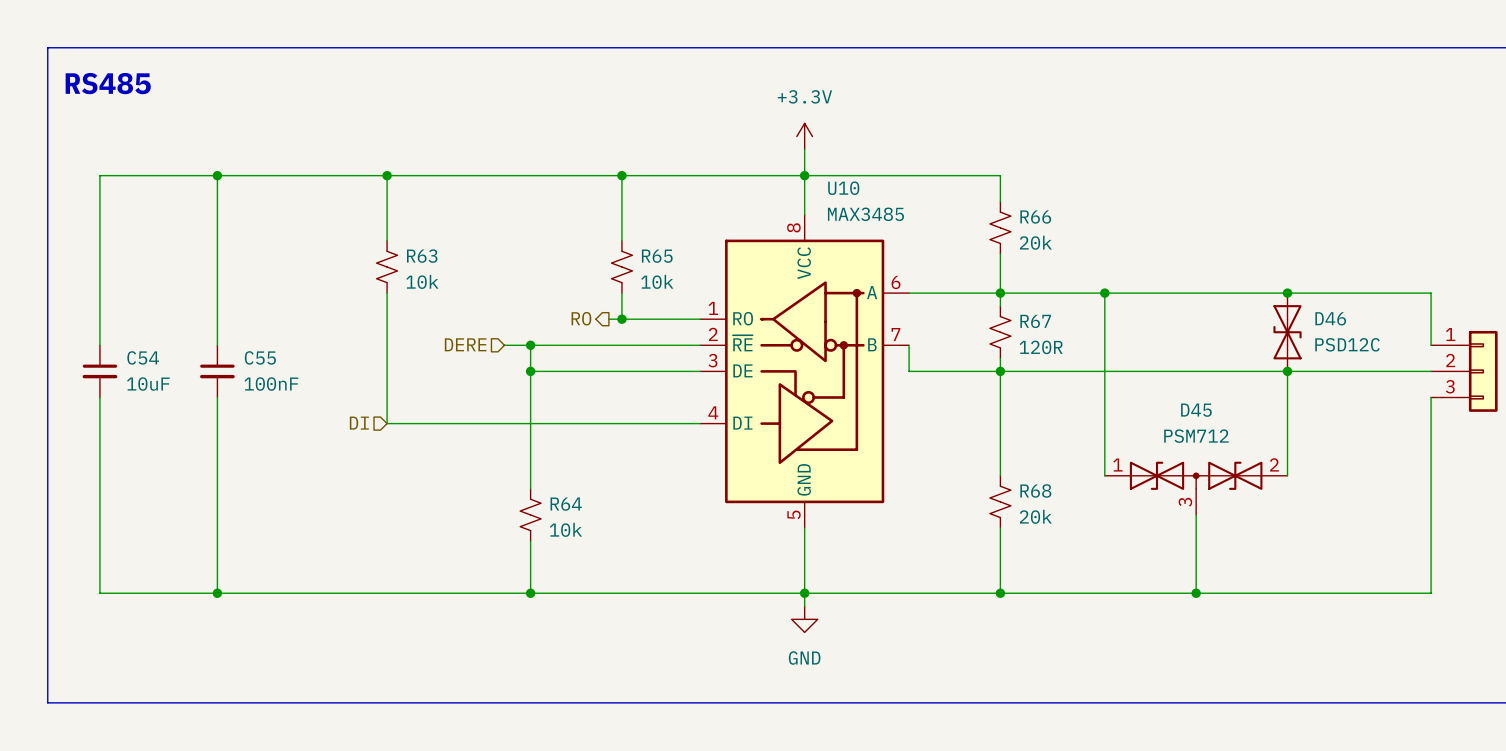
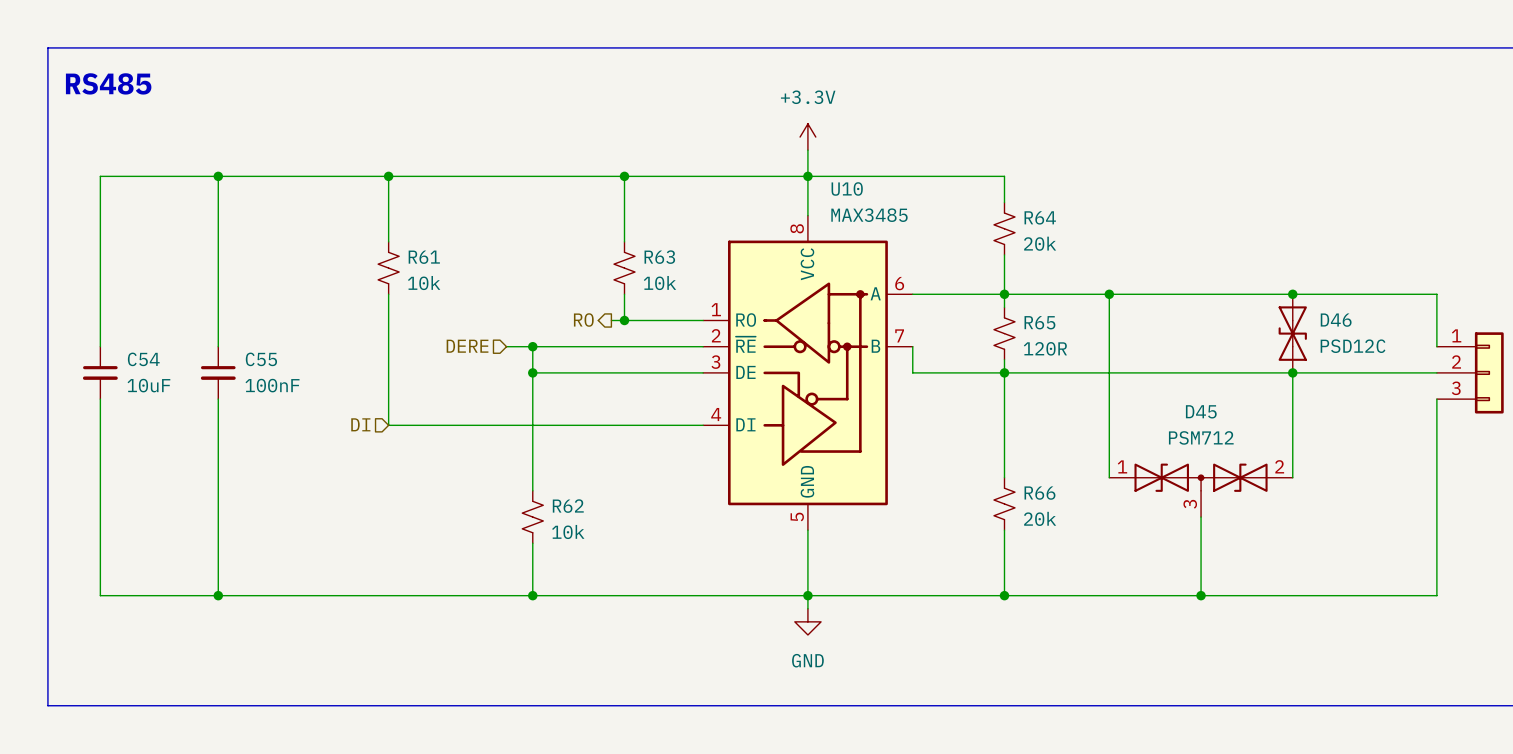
R66 name: R66 (1035, 217) -> R64 (1040, 217)
R63 name: R63 (422, 256) -> R61 (424, 257)
R65 name: R65 (657, 256) -> R63 (659, 257)
R67 name: R67 (1035, 321) -> R65 (1039, 322)
R68 name: R68 (1035, 490) -> R66 (1039, 493)
R64 name: R64 (566, 504) -> R62 (568, 506)

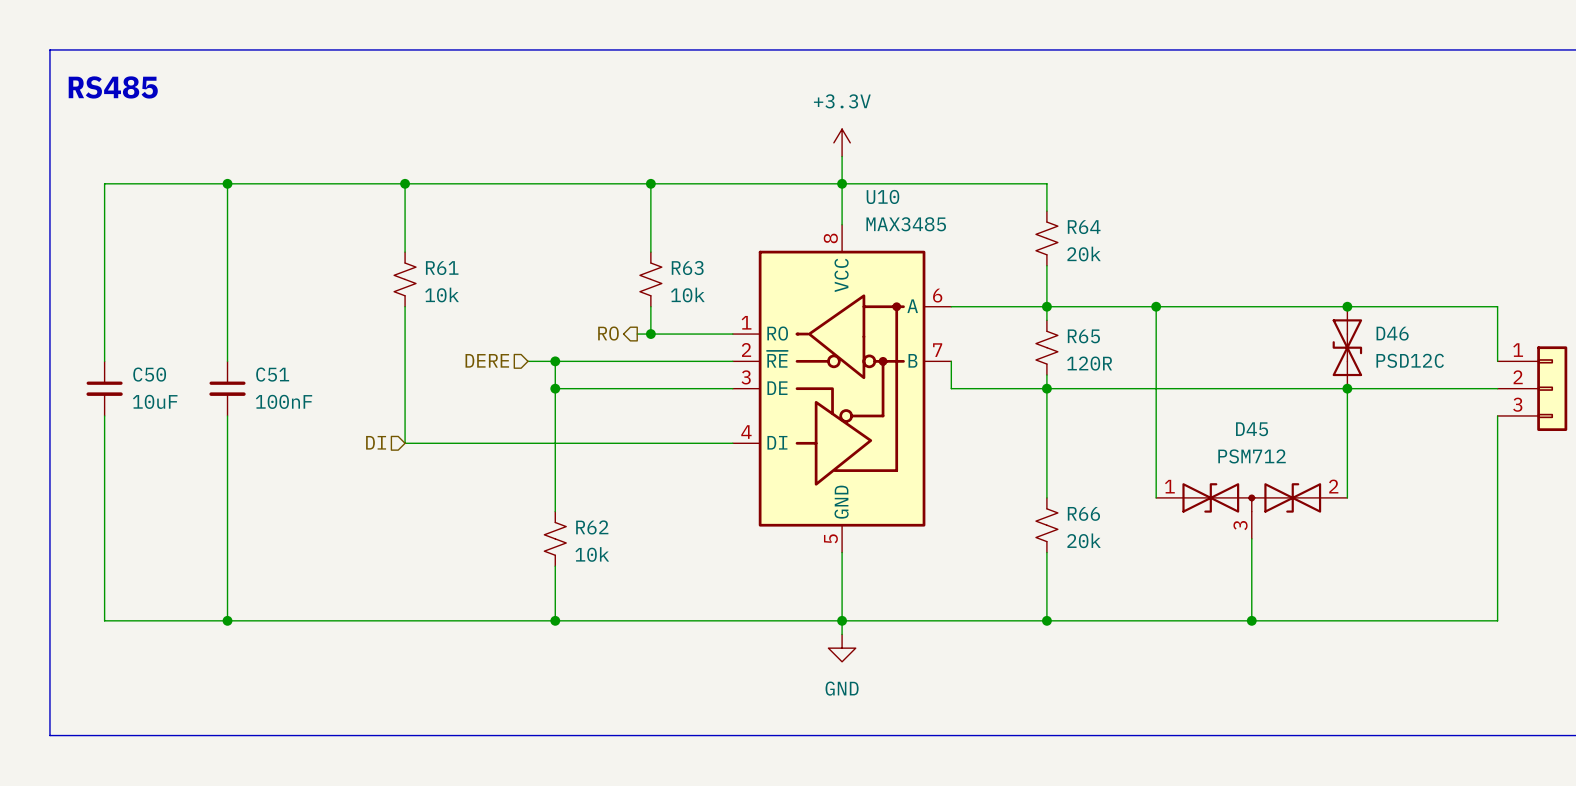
C54 name: C54 (143, 359) -> C50 (149, 374)
C55 name: C55 (261, 359) -> C51 (272, 374)

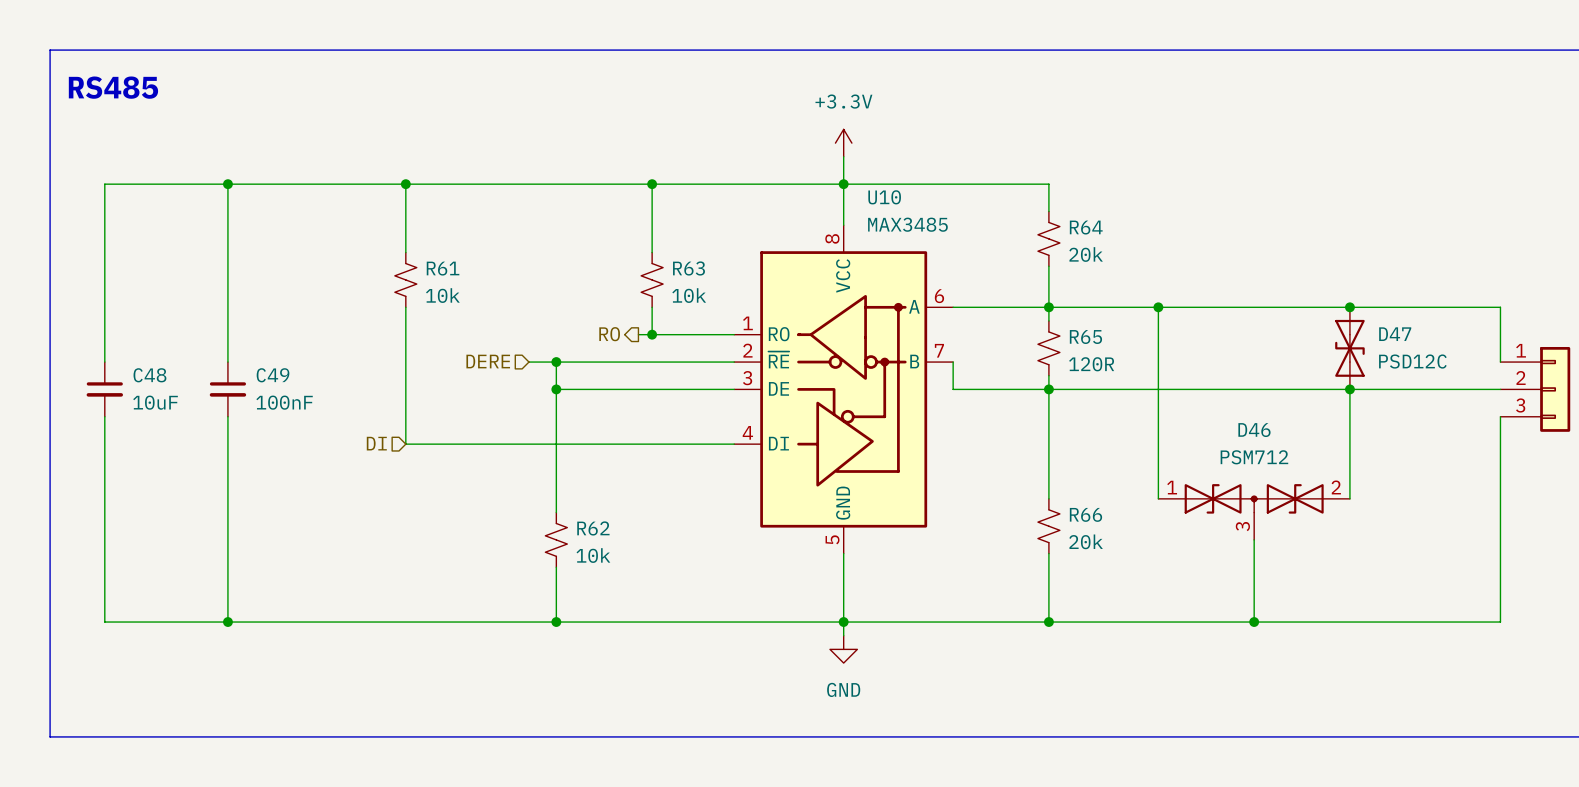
D46 name: D46 (1392, 333) -> D47 (1395, 334)
C50 name: C50 (149, 374) -> C48 (149, 375)
C51 name: C51 (272, 374) -> C49 (273, 375)
D45 name: D45 (1252, 429) -> D46 (1254, 430)

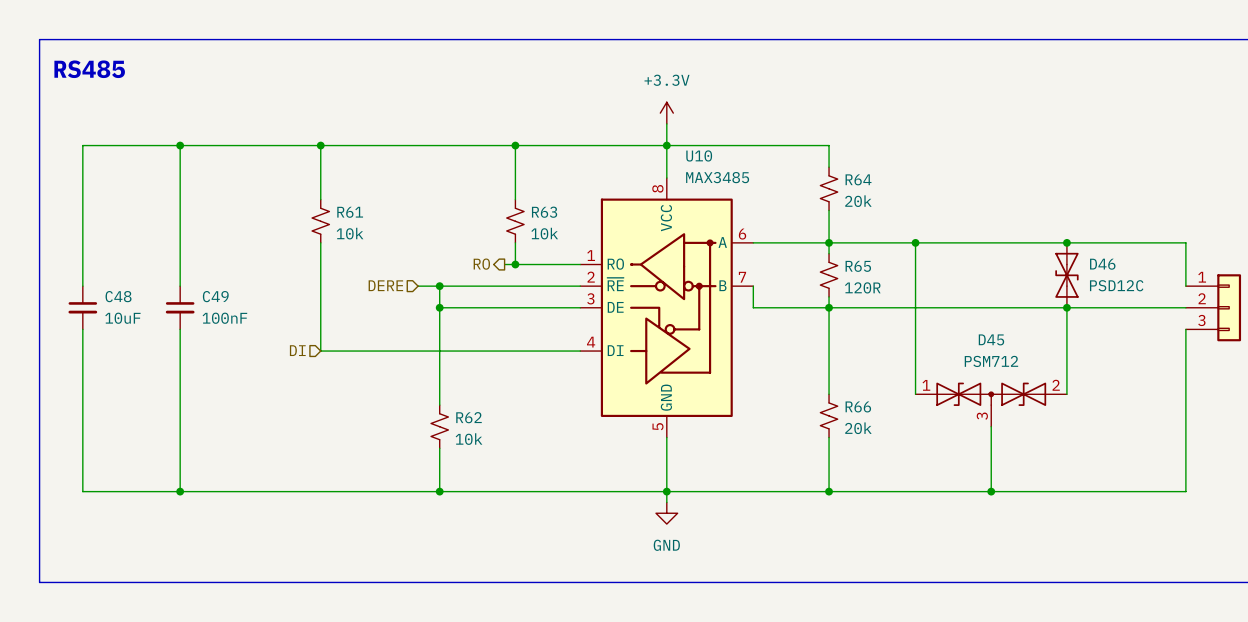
D47 name: D47 (1395, 334) -> D46 (1102, 264)
D46 name: D46 (1254, 430) -> D45 (991, 339)

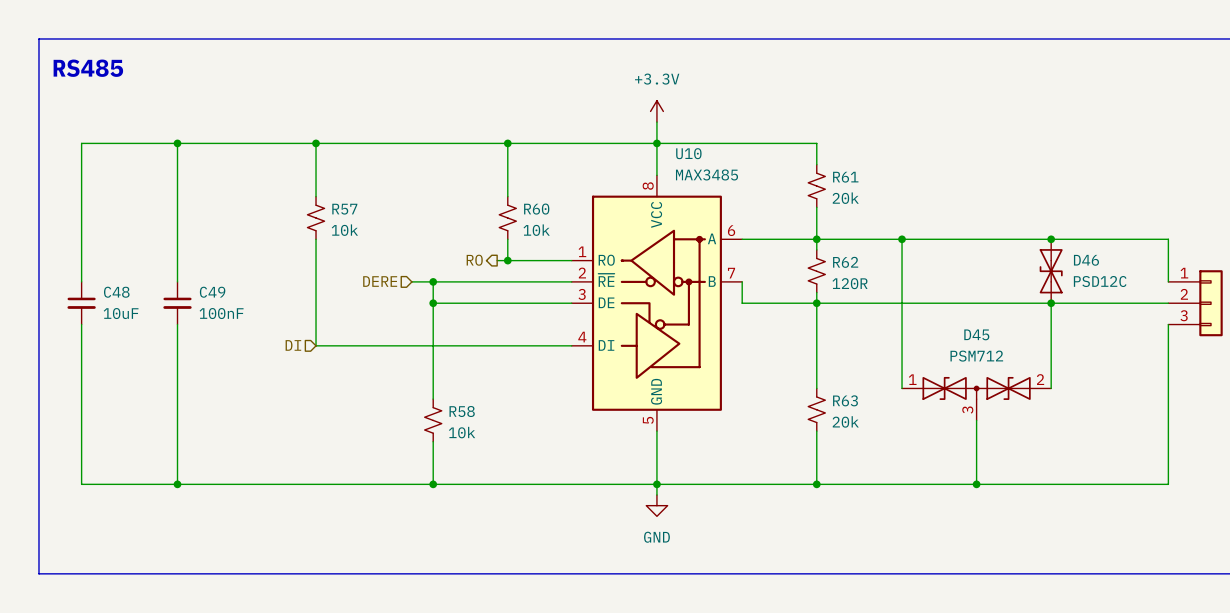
R64 name: R64 (858, 179) -> R61 (845, 177)
R61 name: R61 (350, 212) -> R57 (344, 209)
R63 name: R63 (544, 212) -> R60 (536, 209)
R65 name: R65 (858, 266) -> R62 (845, 262)
R66 name: R66 (858, 406) -> R63 (845, 400)
R62 name: R62 (469, 417) -> R58 (462, 411)

